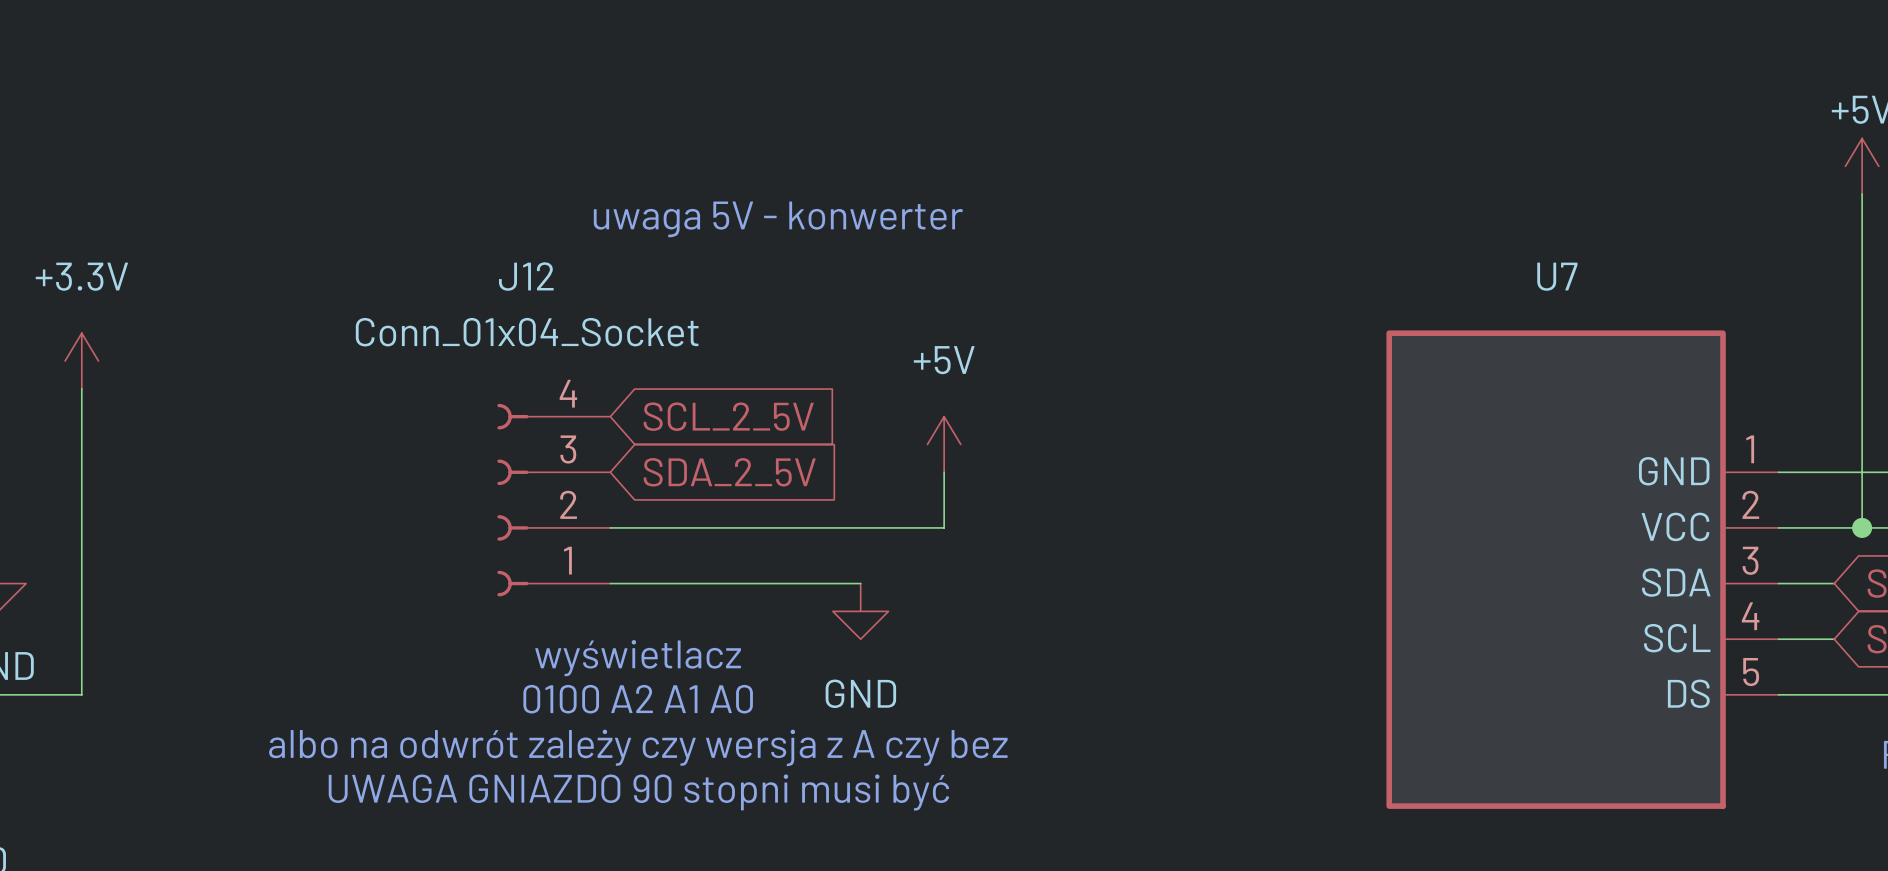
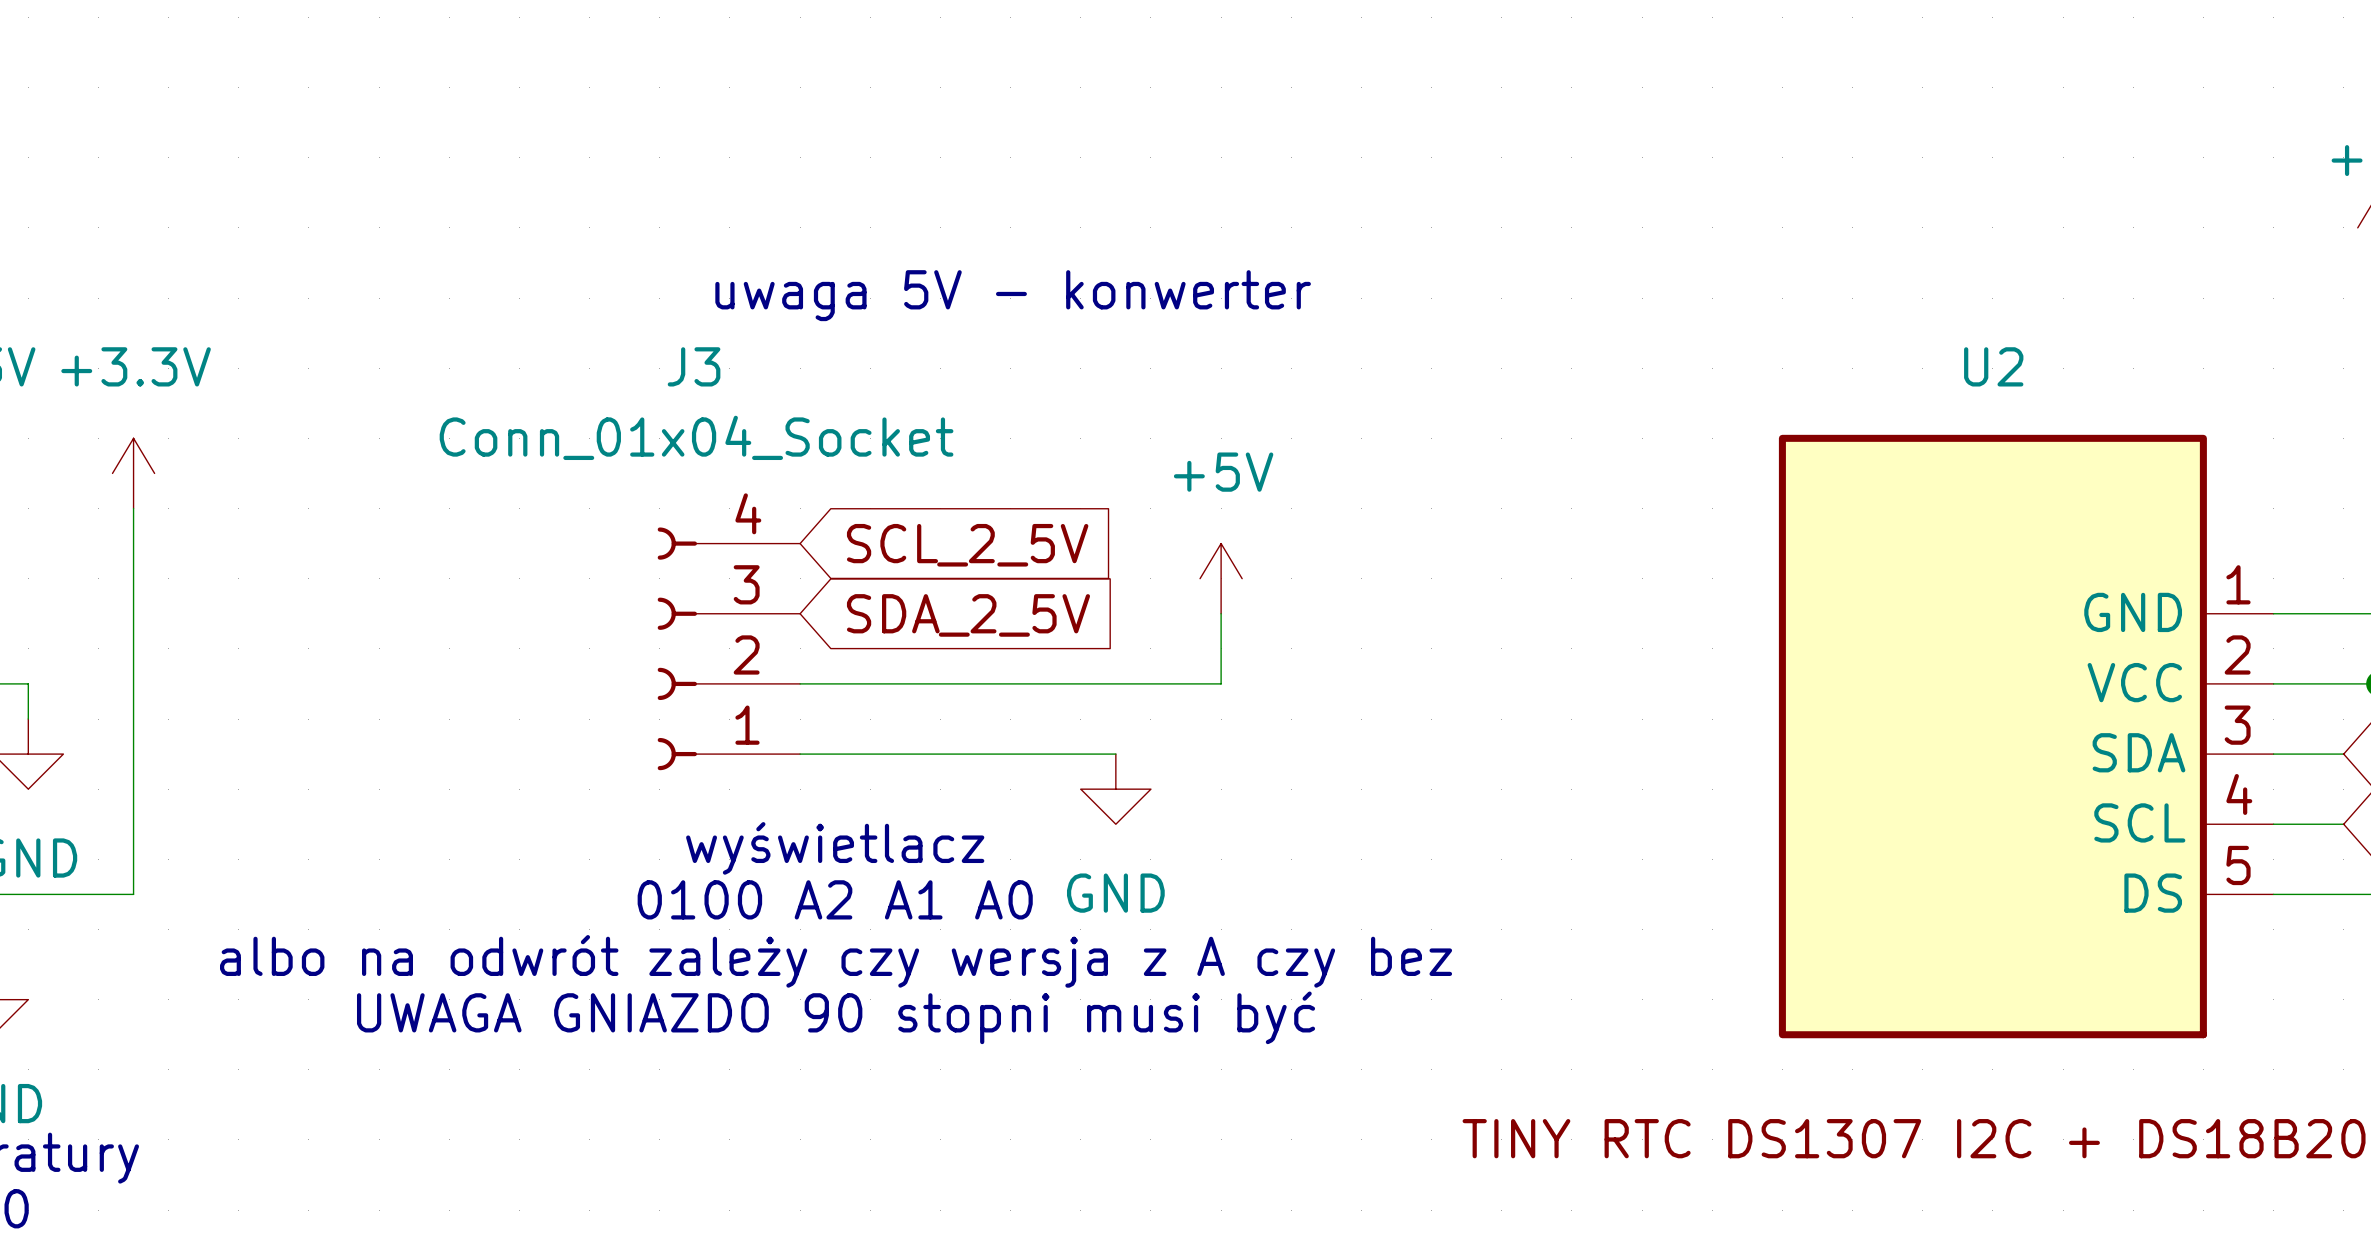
J12 name: J12 (526, 276) -> J3 (694, 366)
U7 name: U7 (1557, 276) -> U2 (1993, 366)

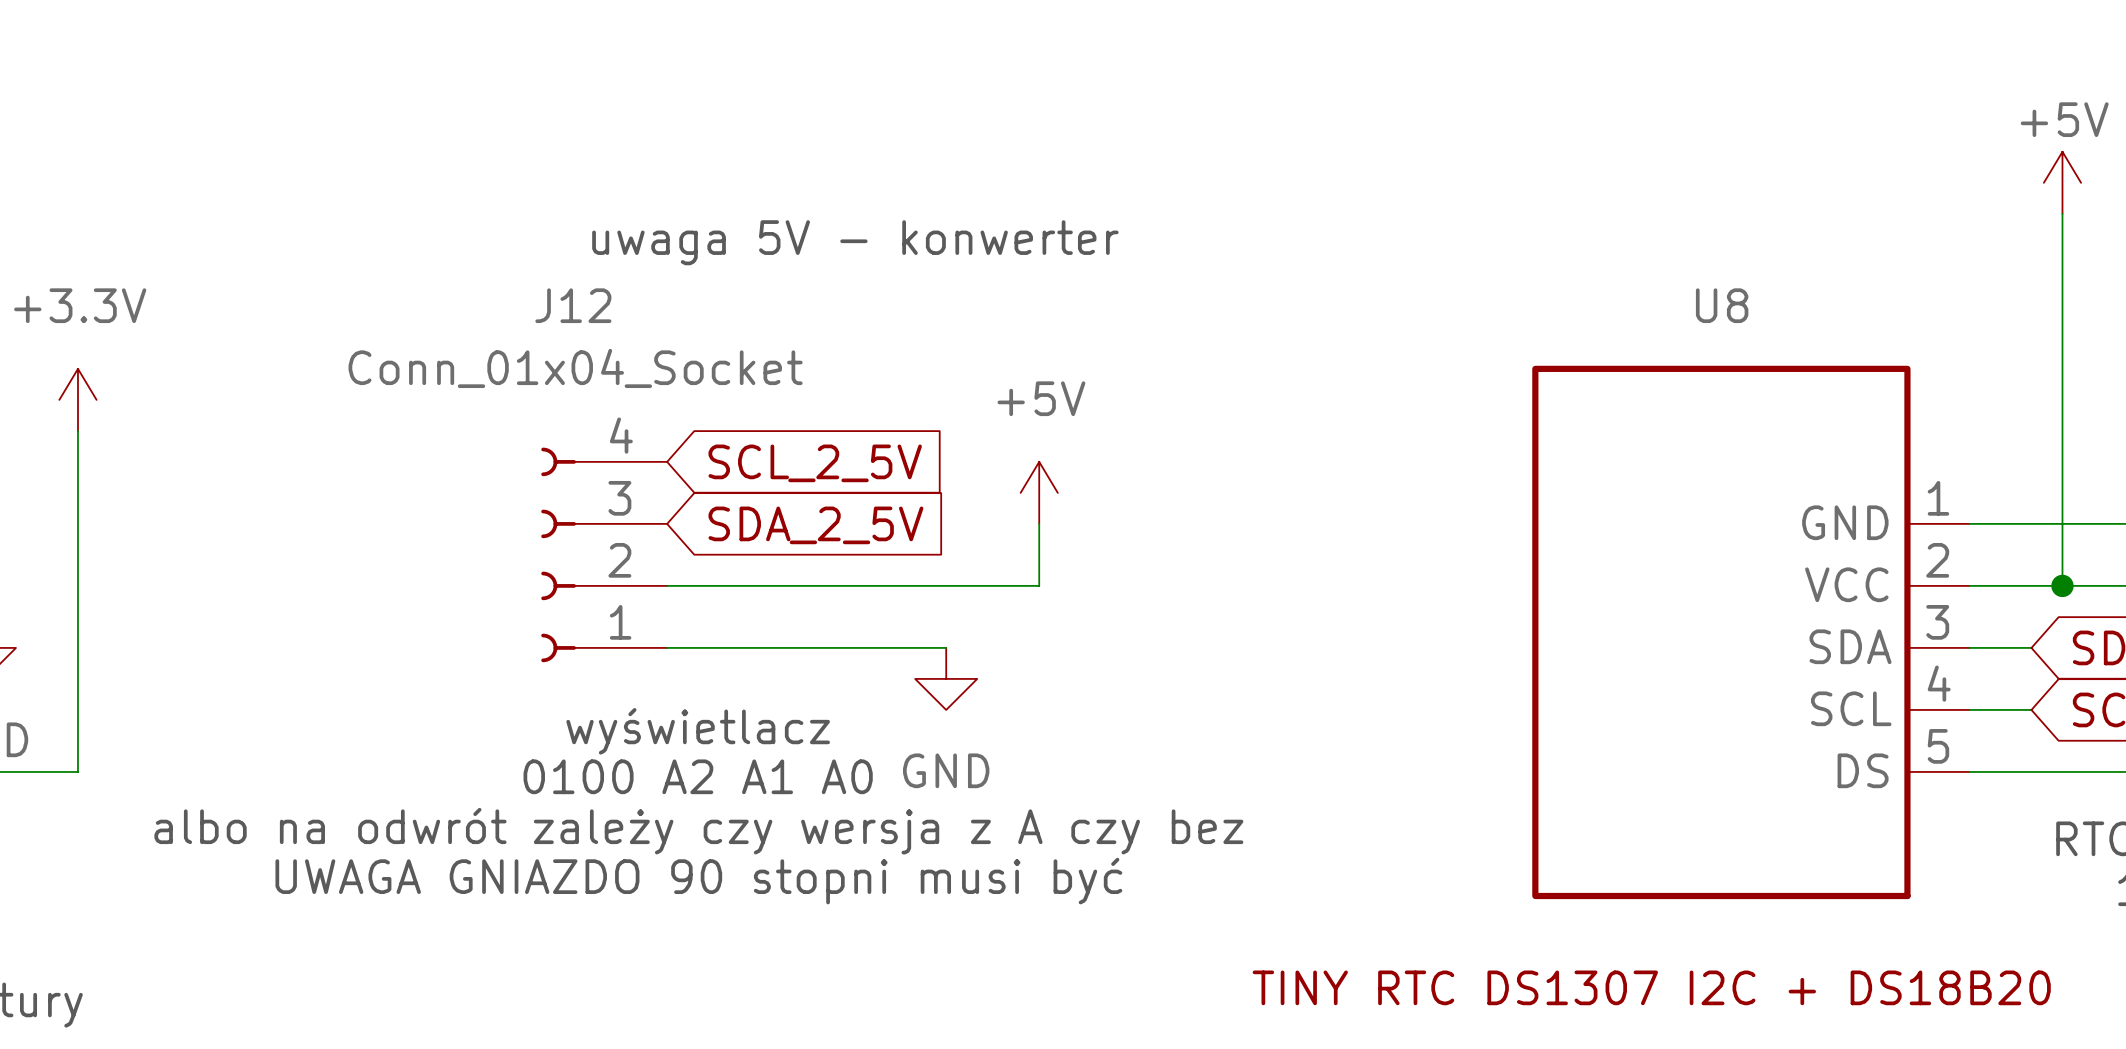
J3 name: J3 (694, 366) -> J12 (573, 305)
U2 name: U2 (1993, 366) -> U8 (1722, 305)

